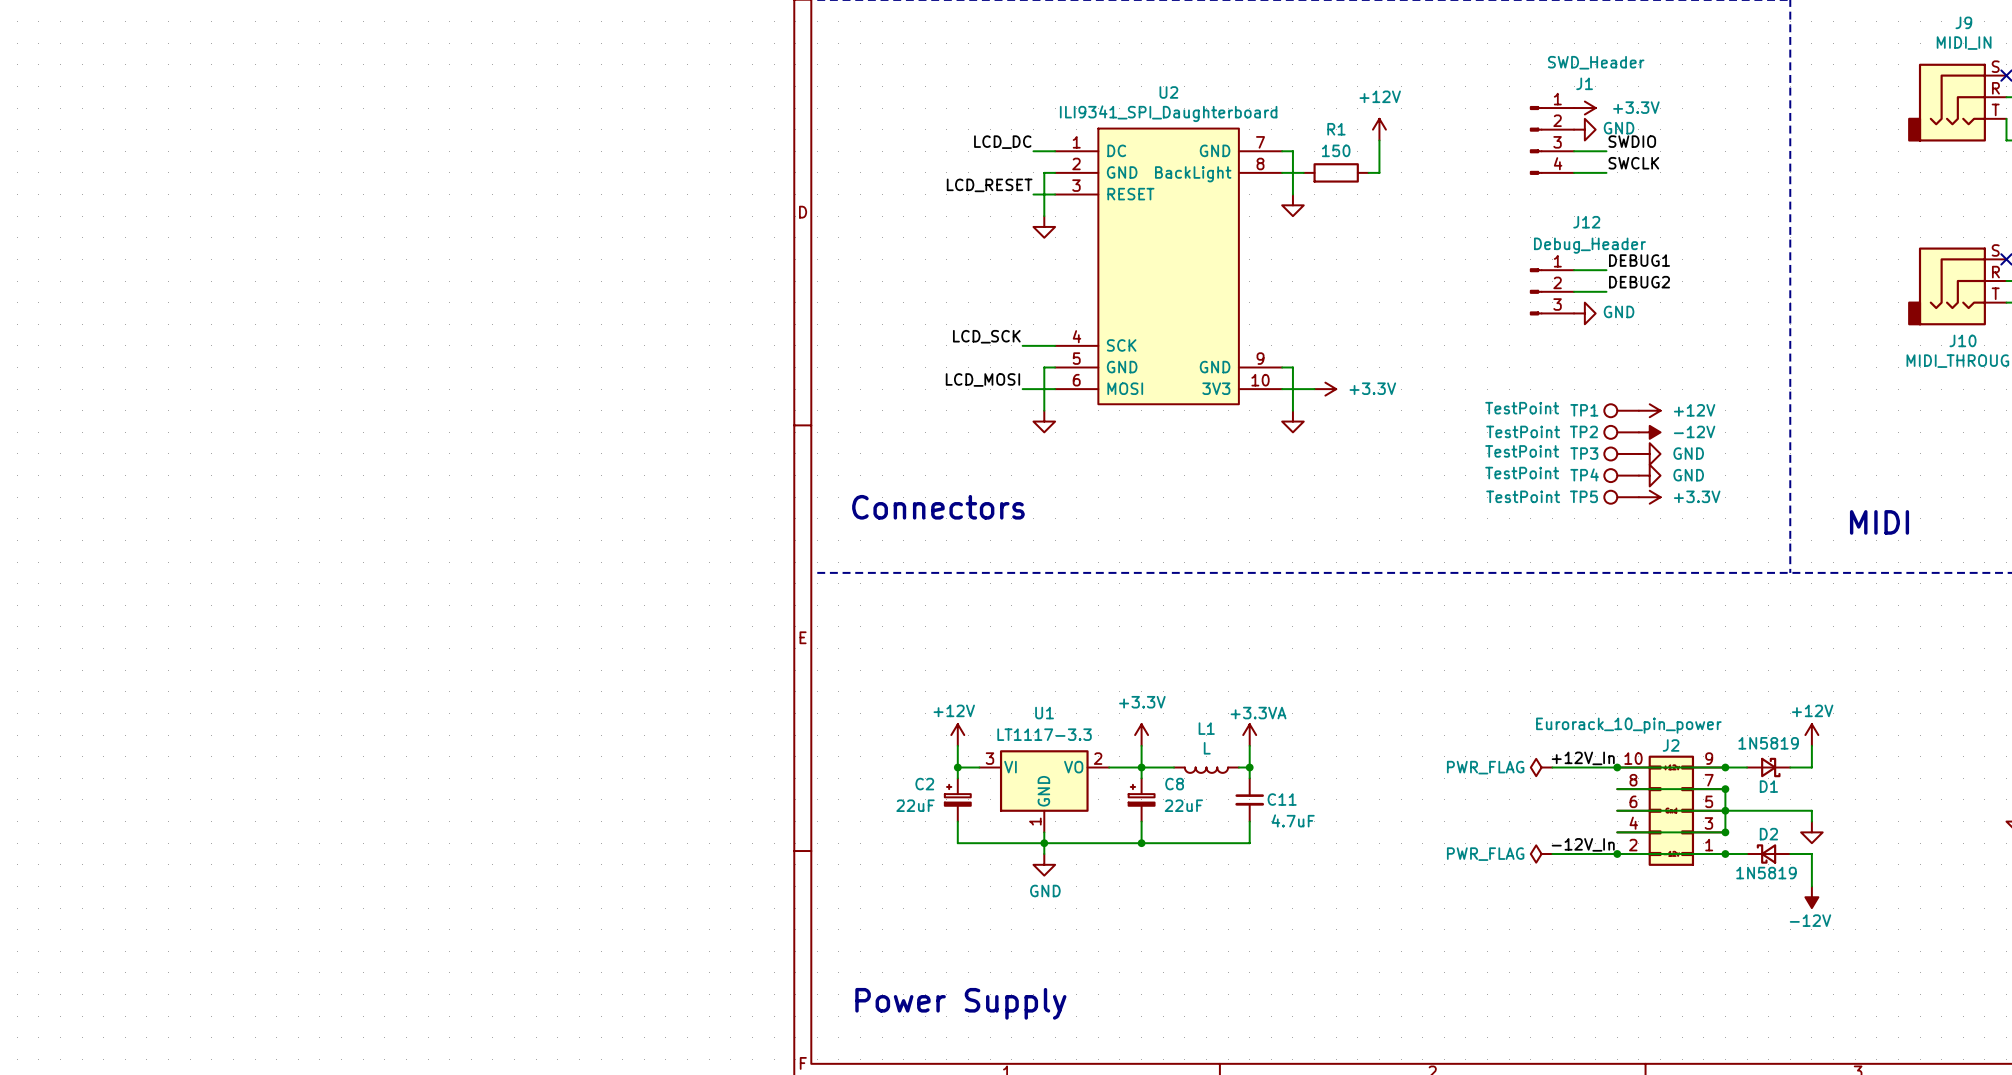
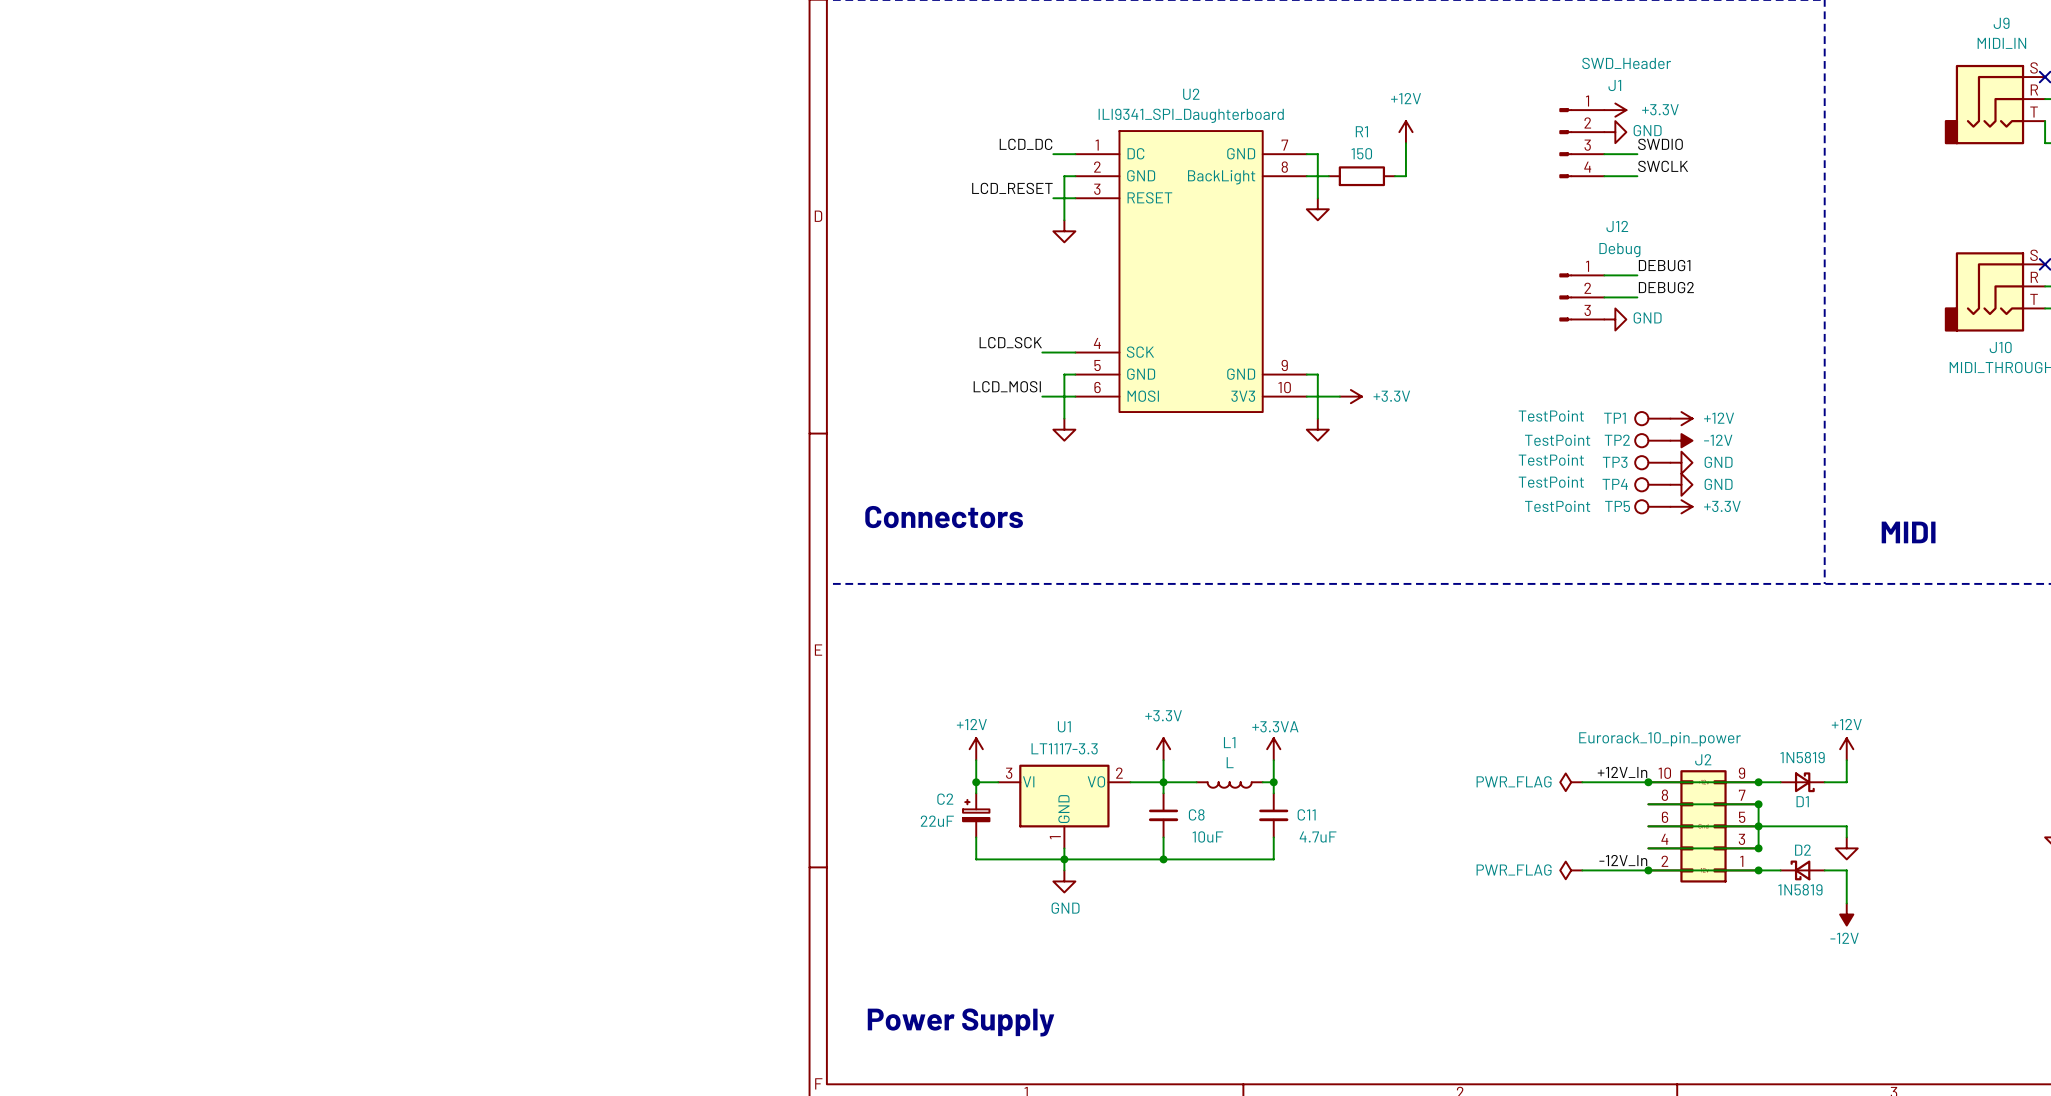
J12 value: Debug_Header (1589, 245) -> Debug (1619, 250)
C8 symbol: [1128, 778, 1155, 822] -> [1148, 793, 1179, 838]
C8 value: 22uF (1183, 805) -> 10uF (1207, 836)

